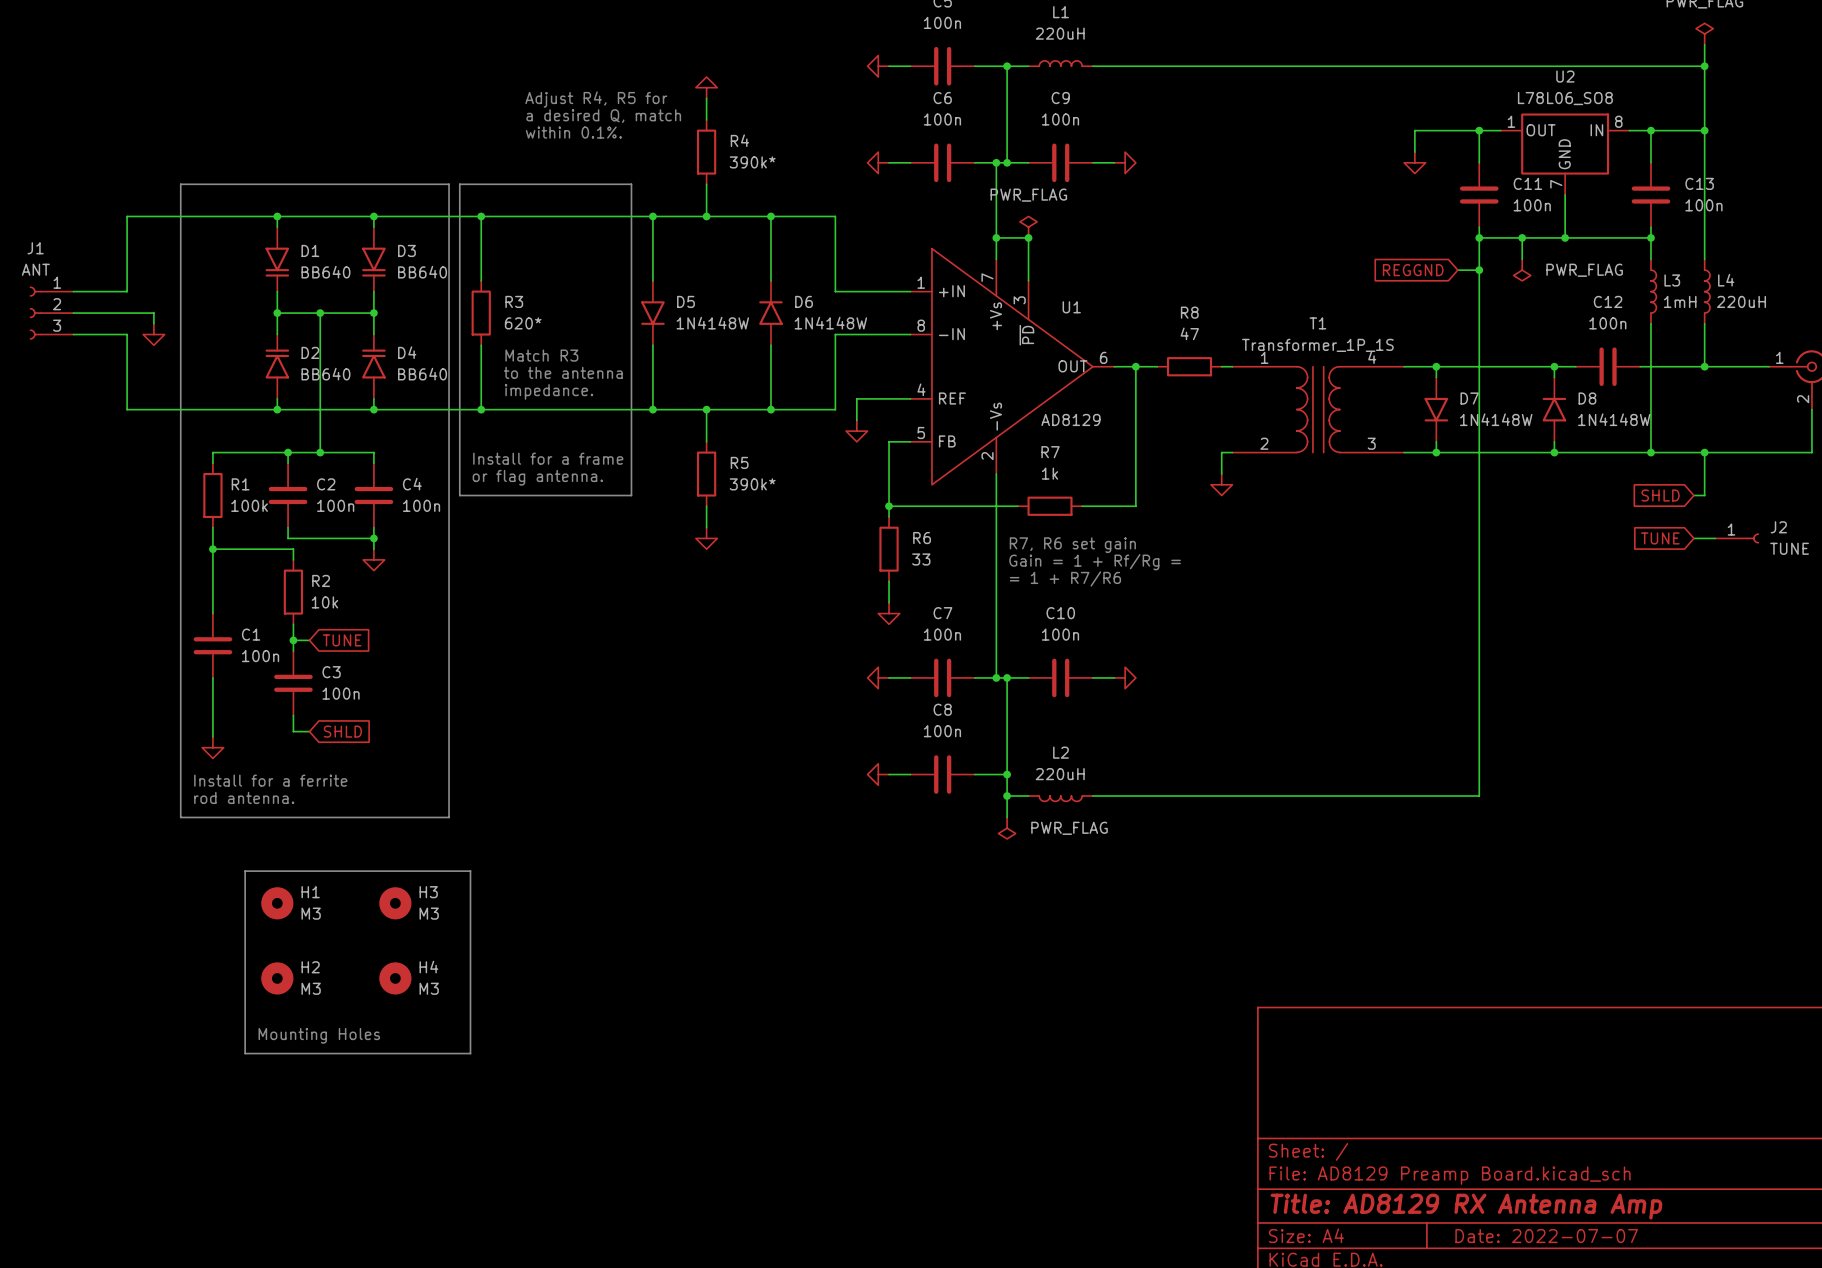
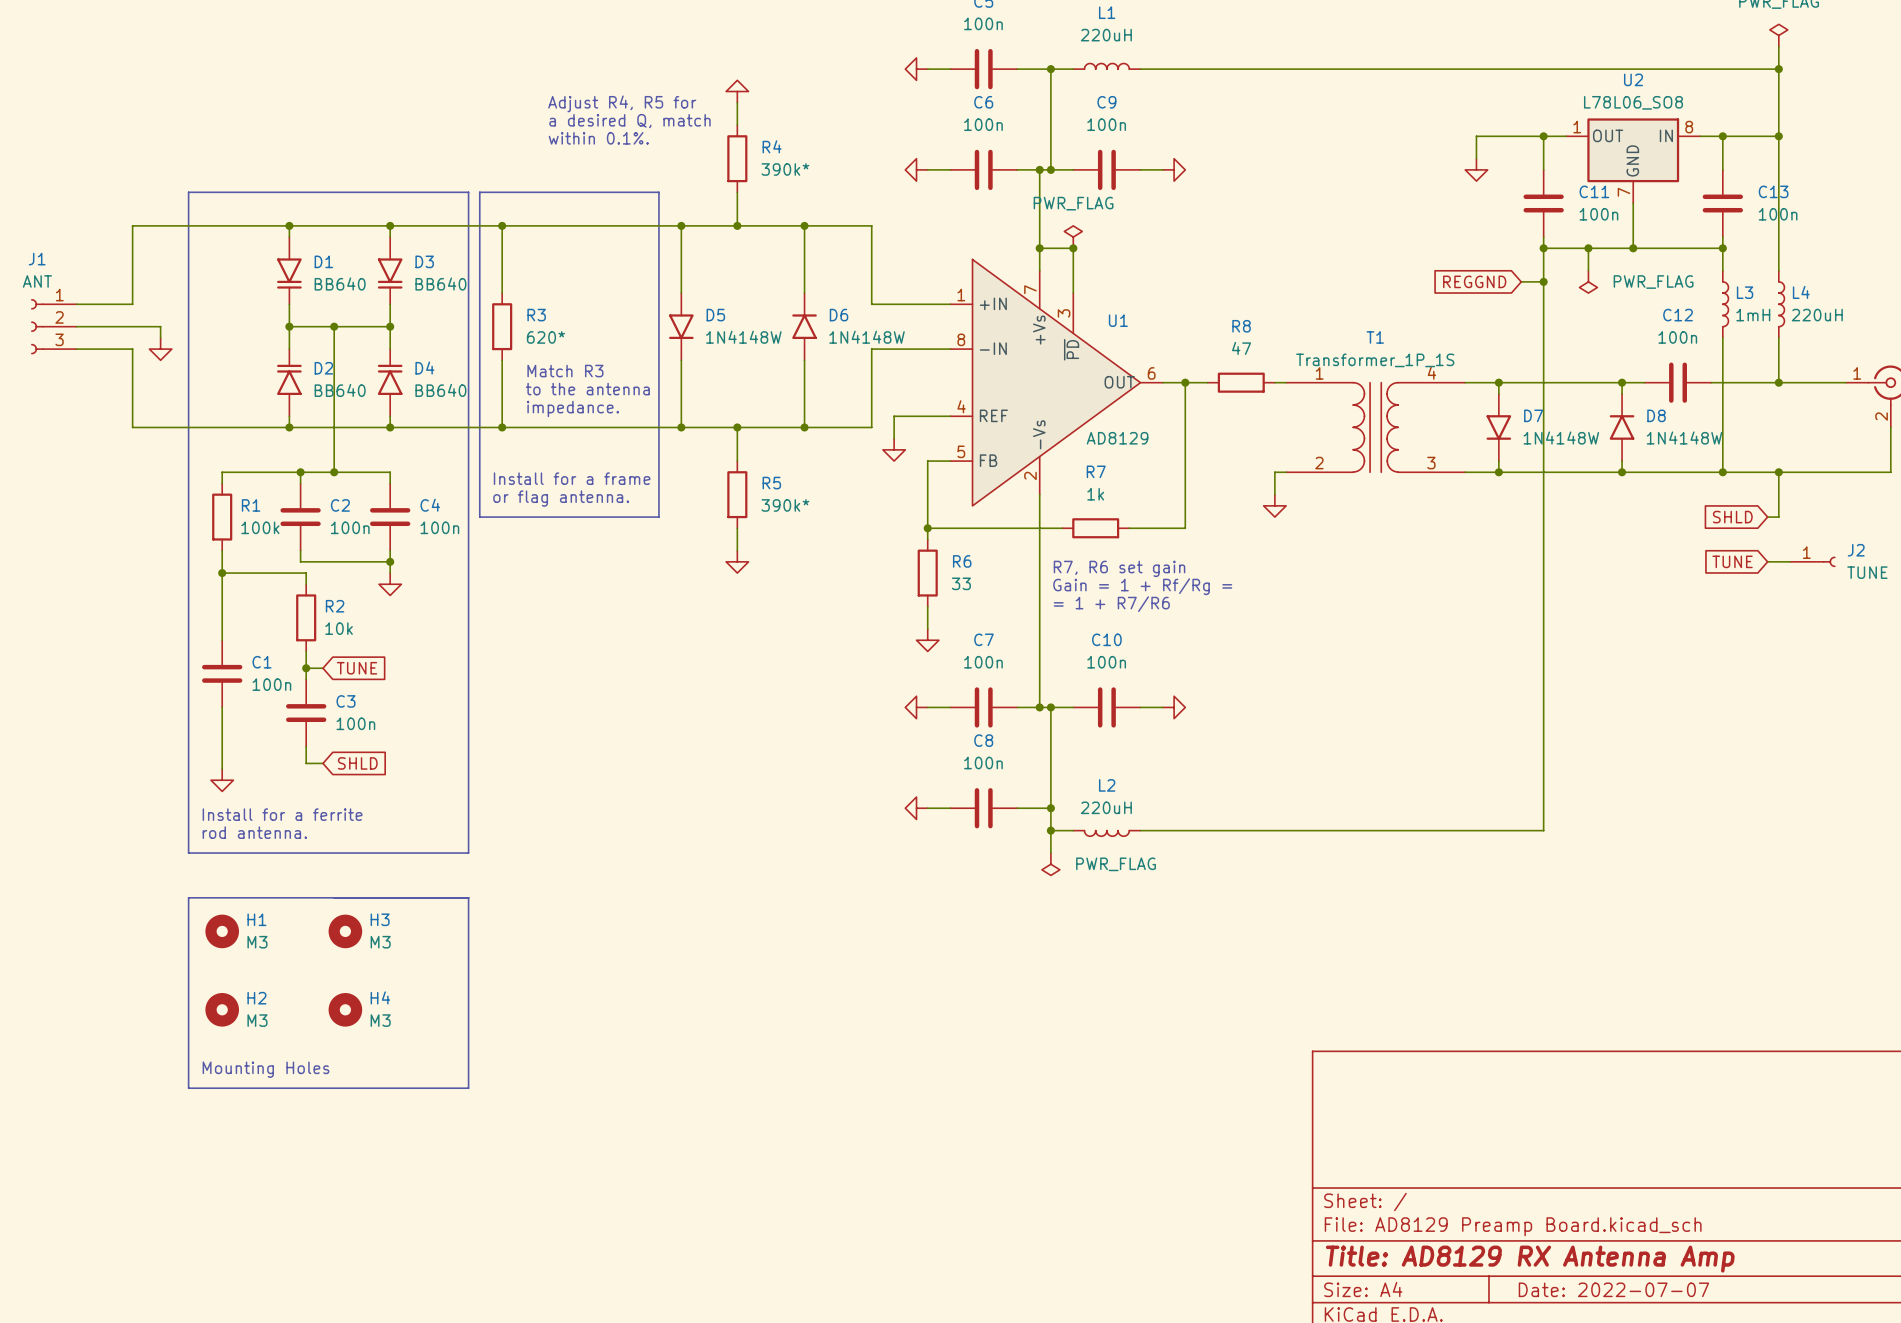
line: (245, 871) (470, 871) (470, 1053) (245, 1053) (245, 871) -> (188, 897) (188, 1088) (468, 1088) (468, 897) (188, 897)
H1 position: (277, 903) -> (222, 931)
H3 position: (395, 903) -> (345, 931)
H2 position: (277, 978) -> (222, 1009)
H4 position: (395, 978) -> (345, 1009)
text position: Mounting Holes (319, 1035) -> Mounting Holes (266, 1069)

